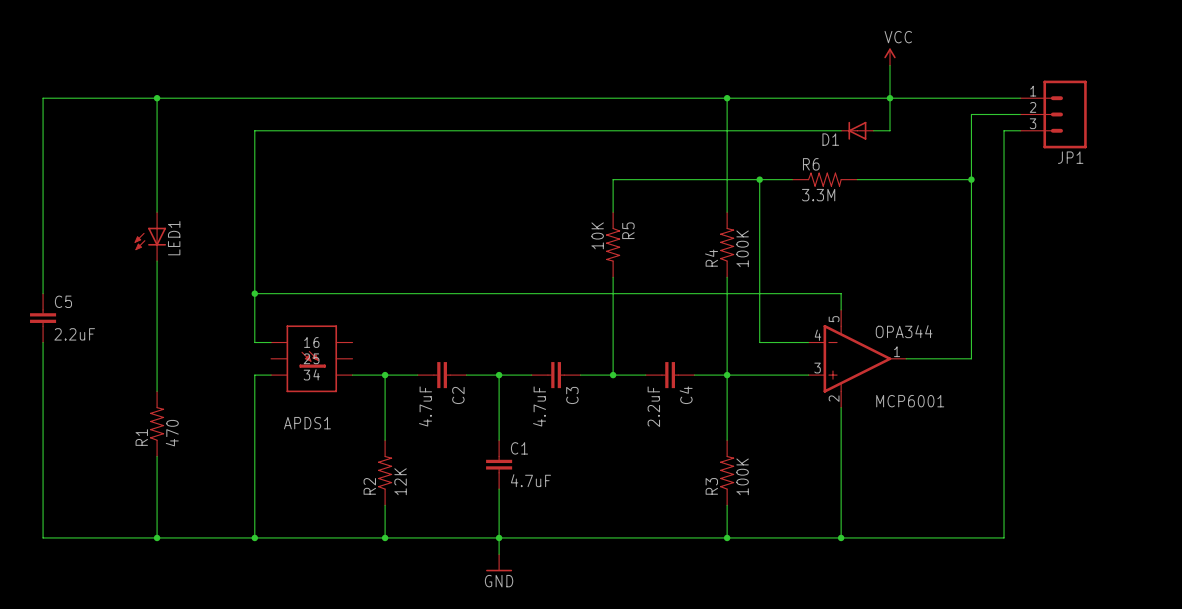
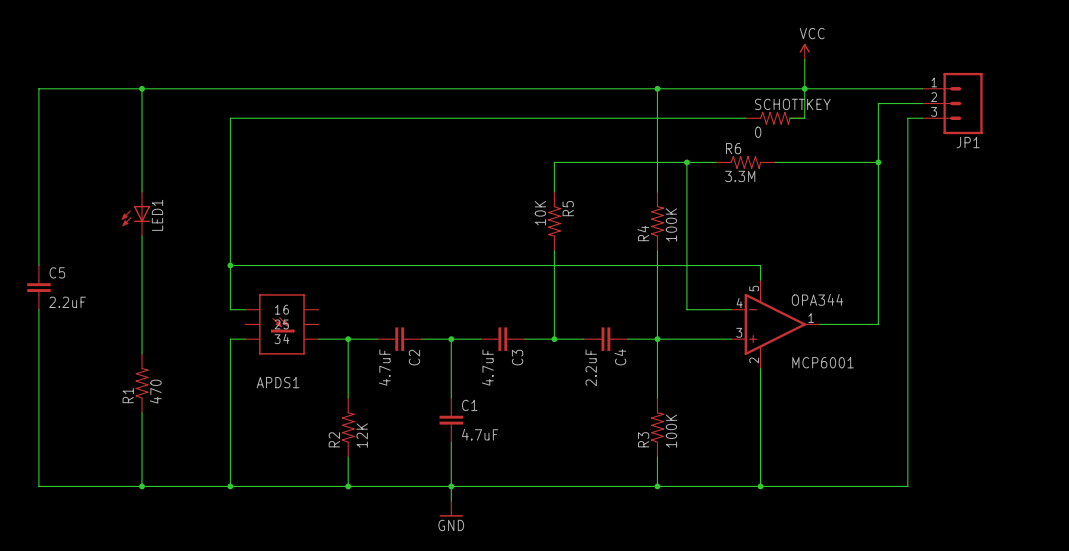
D1: (857, 130) -> none
SCHOTTKEY: none -> 0 (775, 118)

